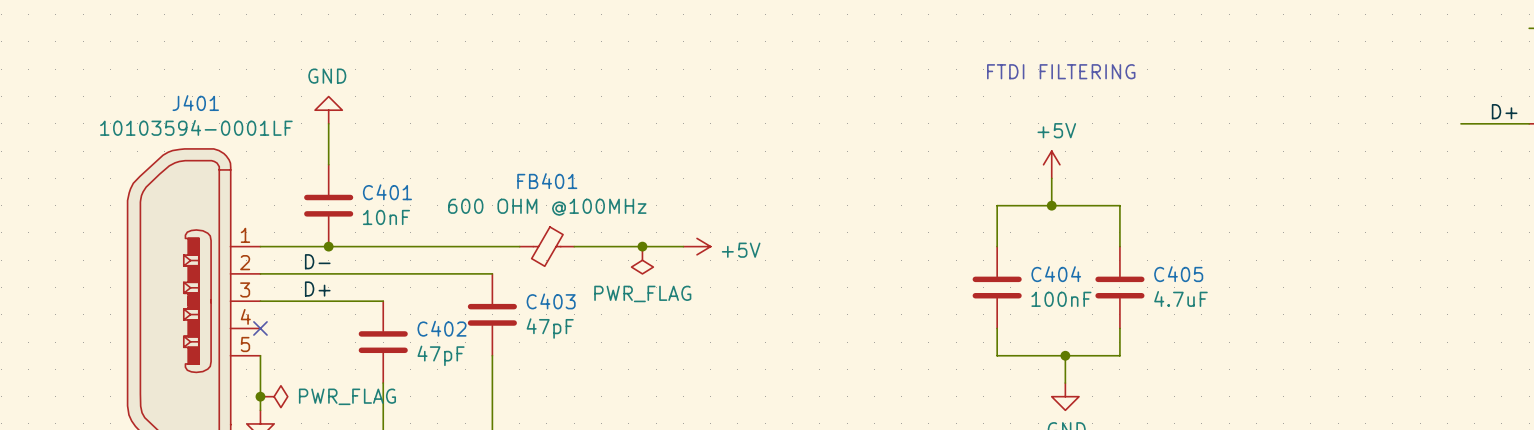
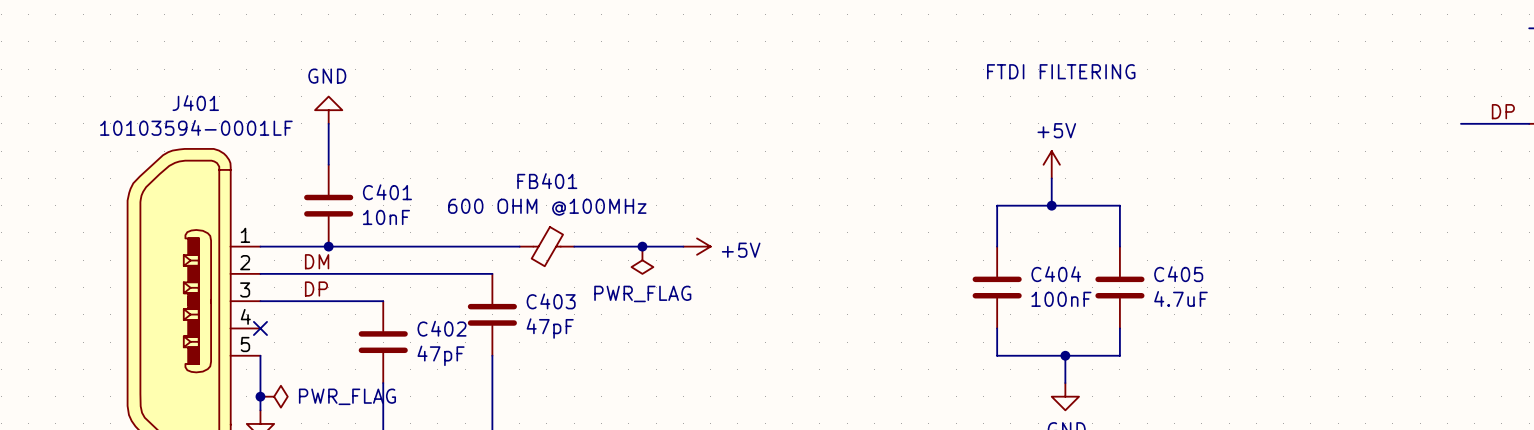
label: D+ (1504, 111) -> DP (1503, 111)
label: D- (317, 261) -> DM (317, 261)
label: D+ (317, 289) -> DP (316, 289)

